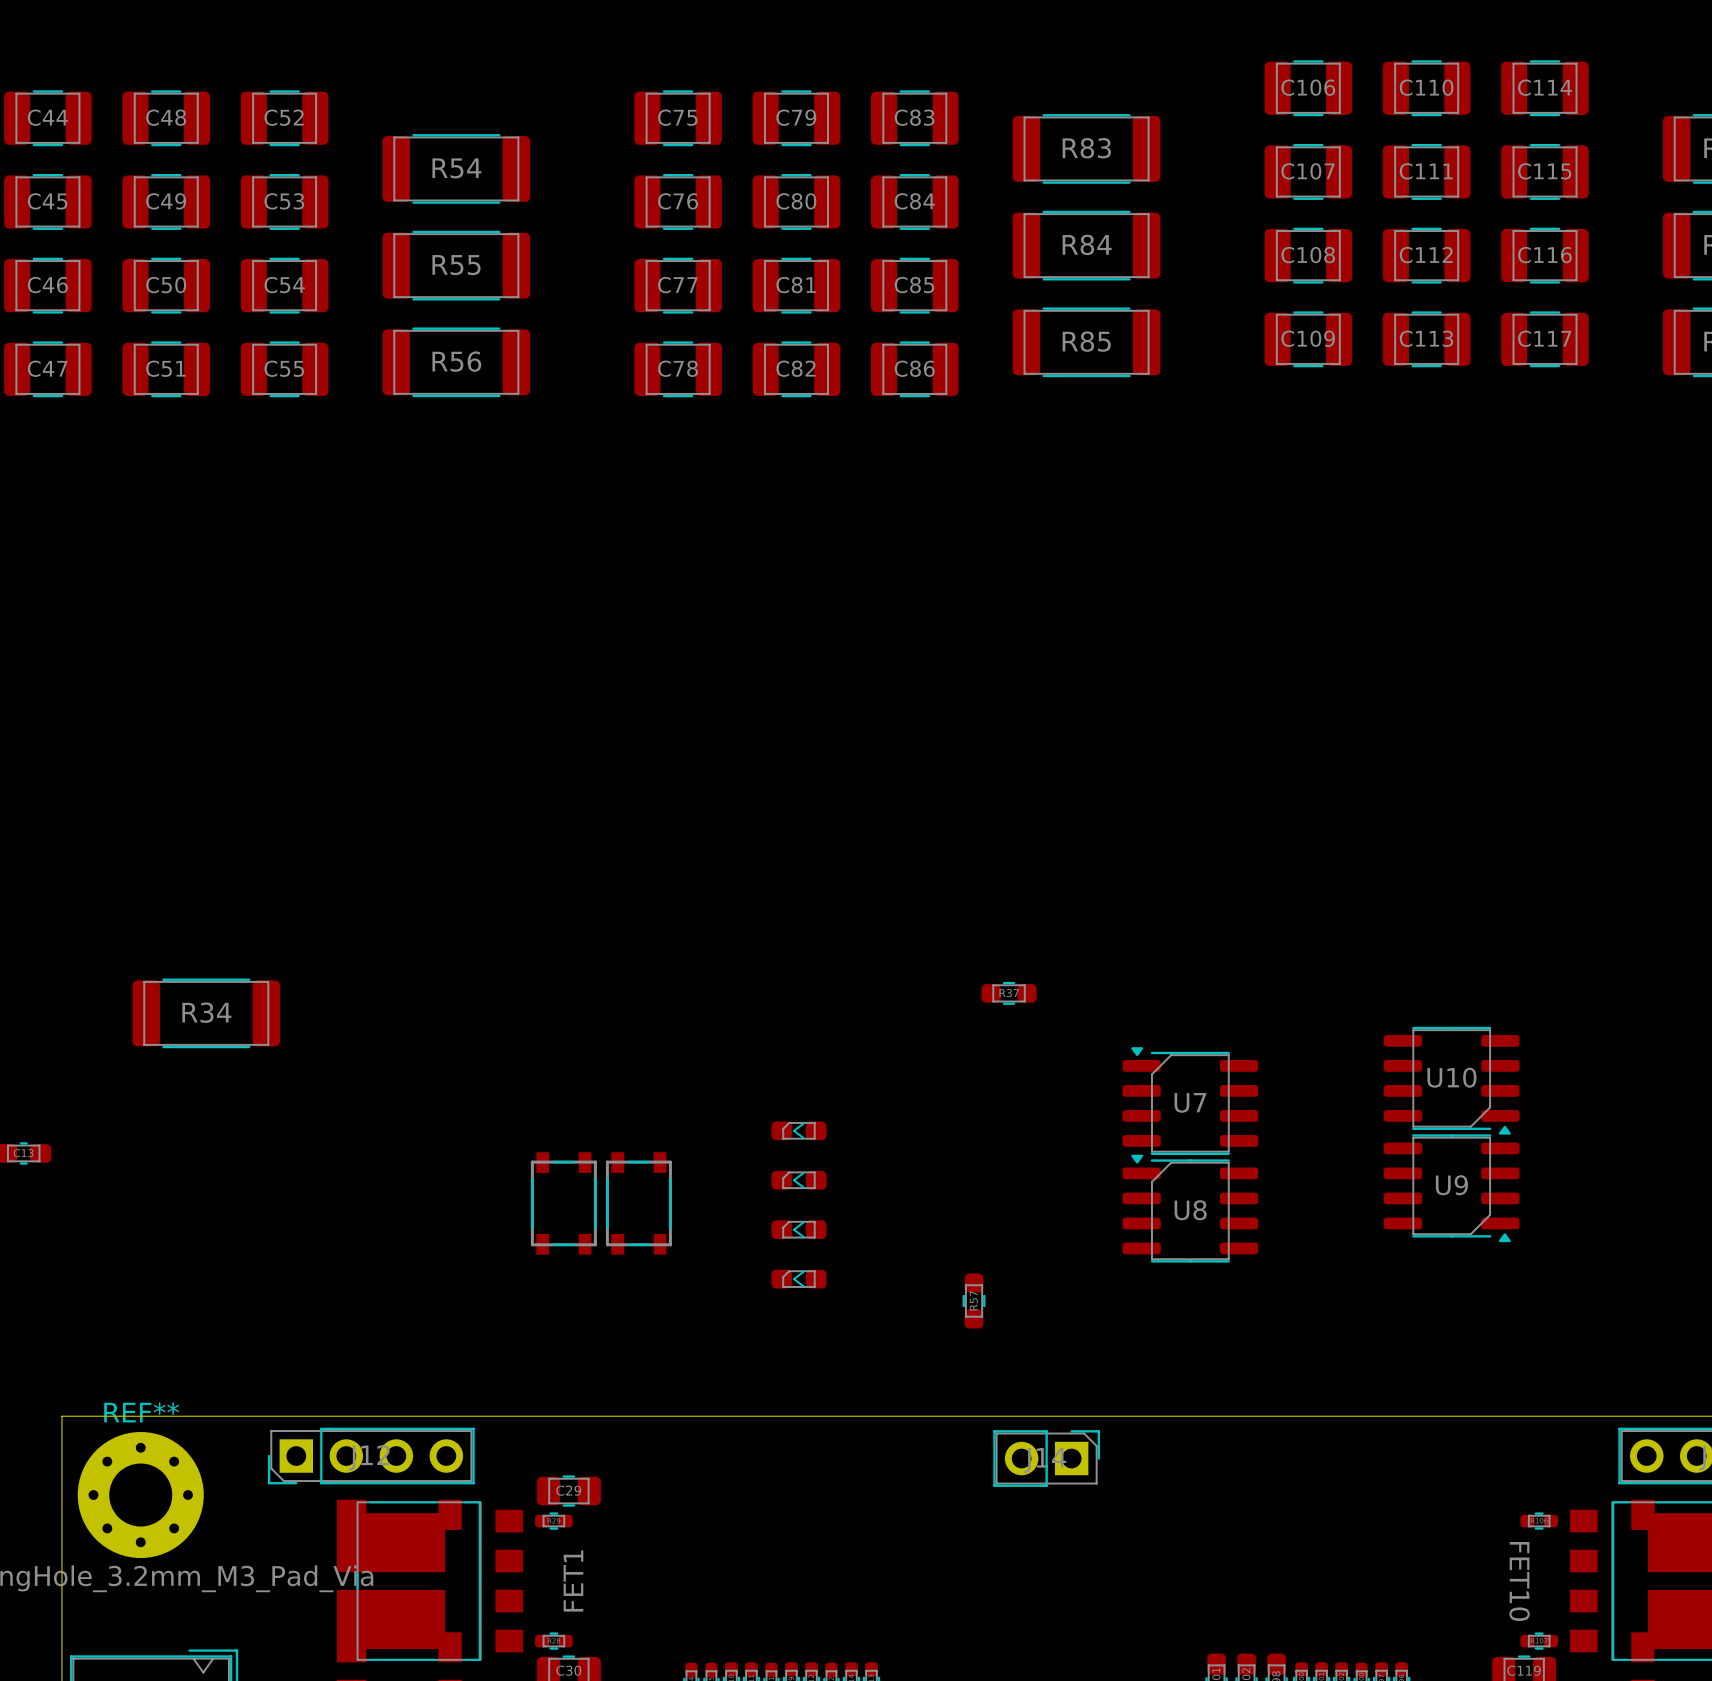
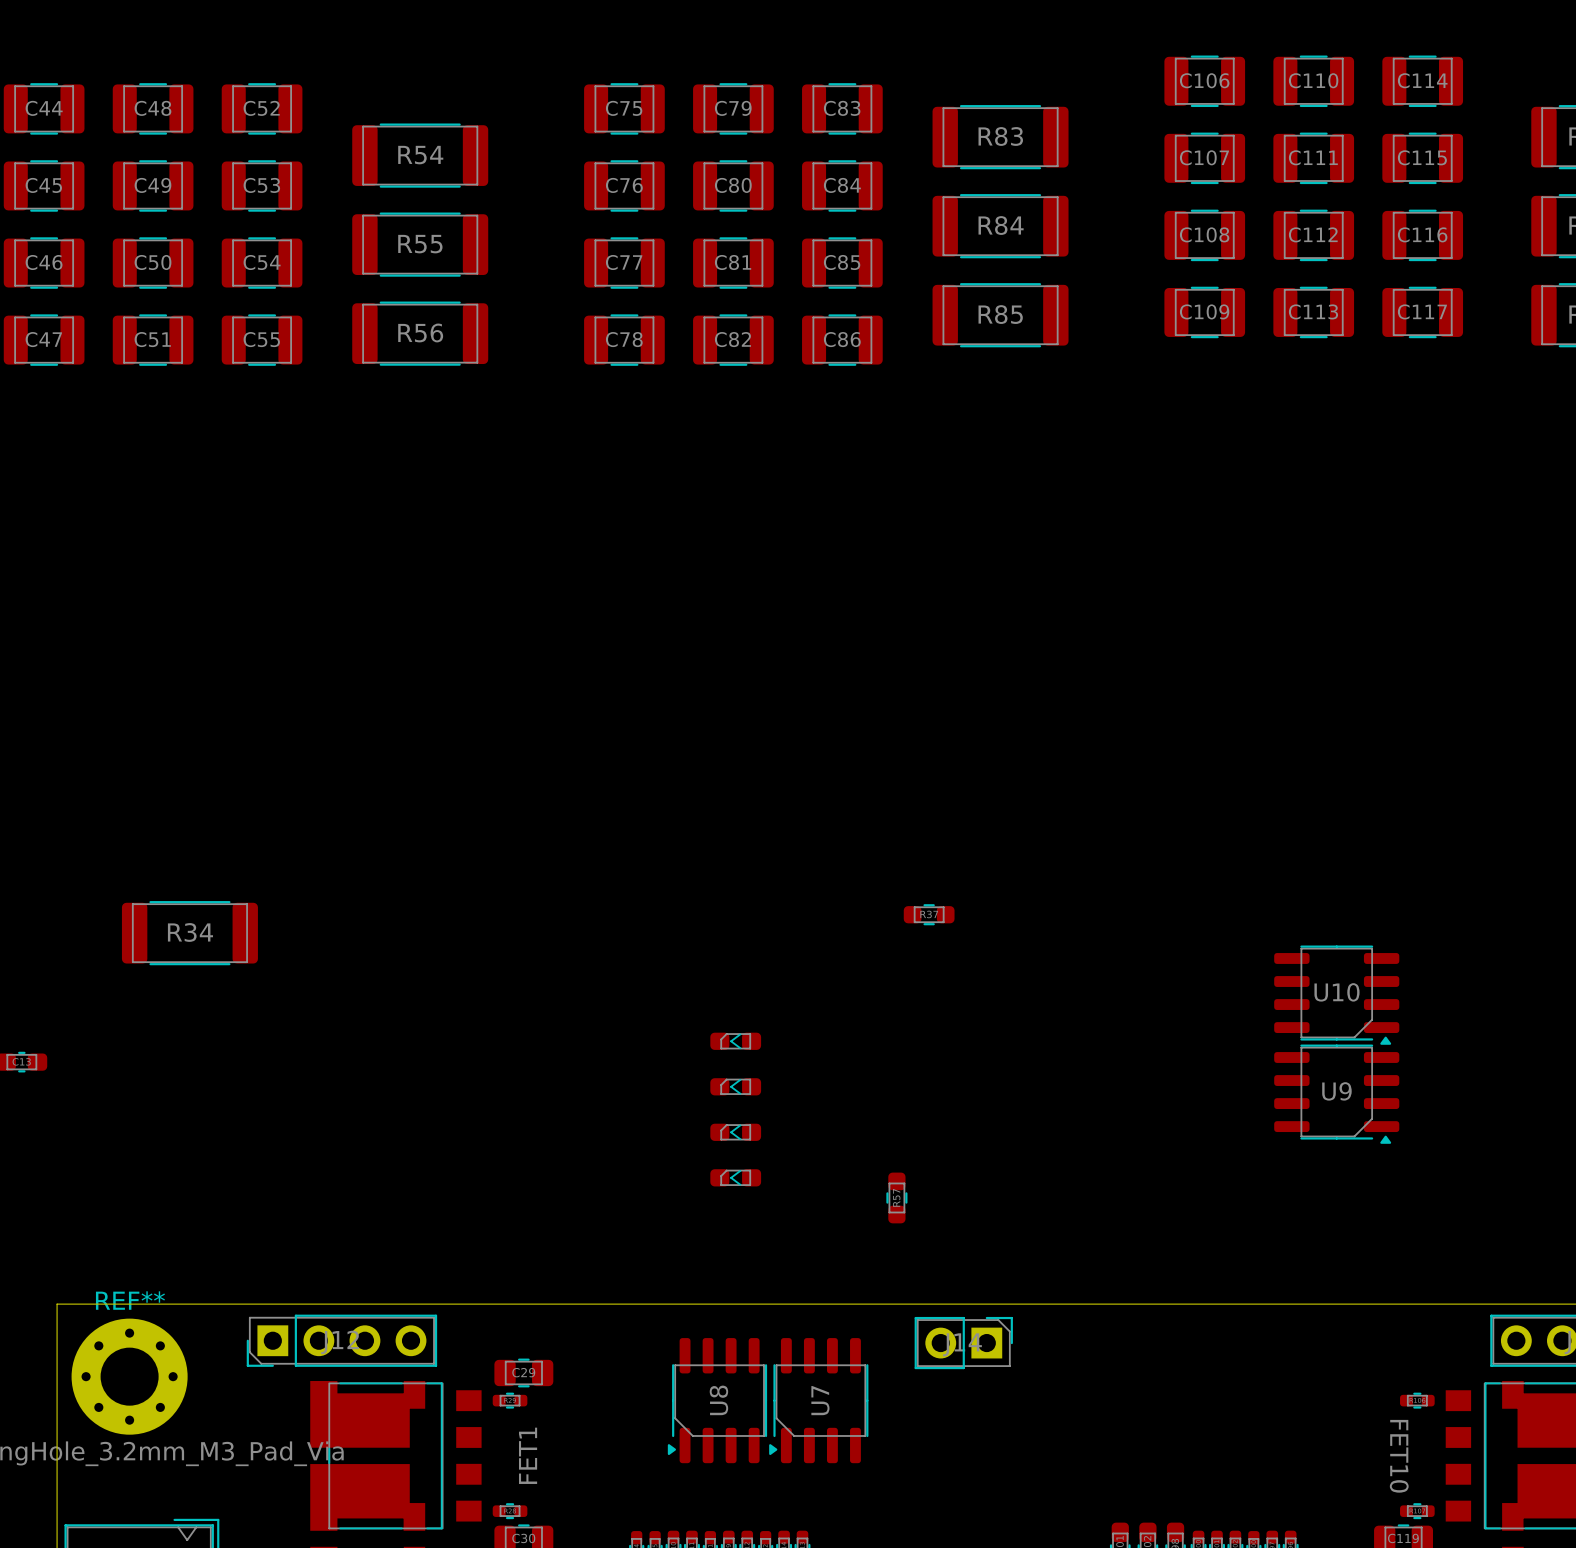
U7 rotation: 0° (1190, 1101) -> 90° counterclockwise (818, 1400)
U7 position: (1190, 1101) -> (818, 1400)
part: (563, 1203) -> none
part: (638, 1203) -> none
U8 rotation: 0° (1190, 1208) -> 90° counterclockwise (717, 1400)
U8 position: (1190, 1208) -> (717, 1400)

